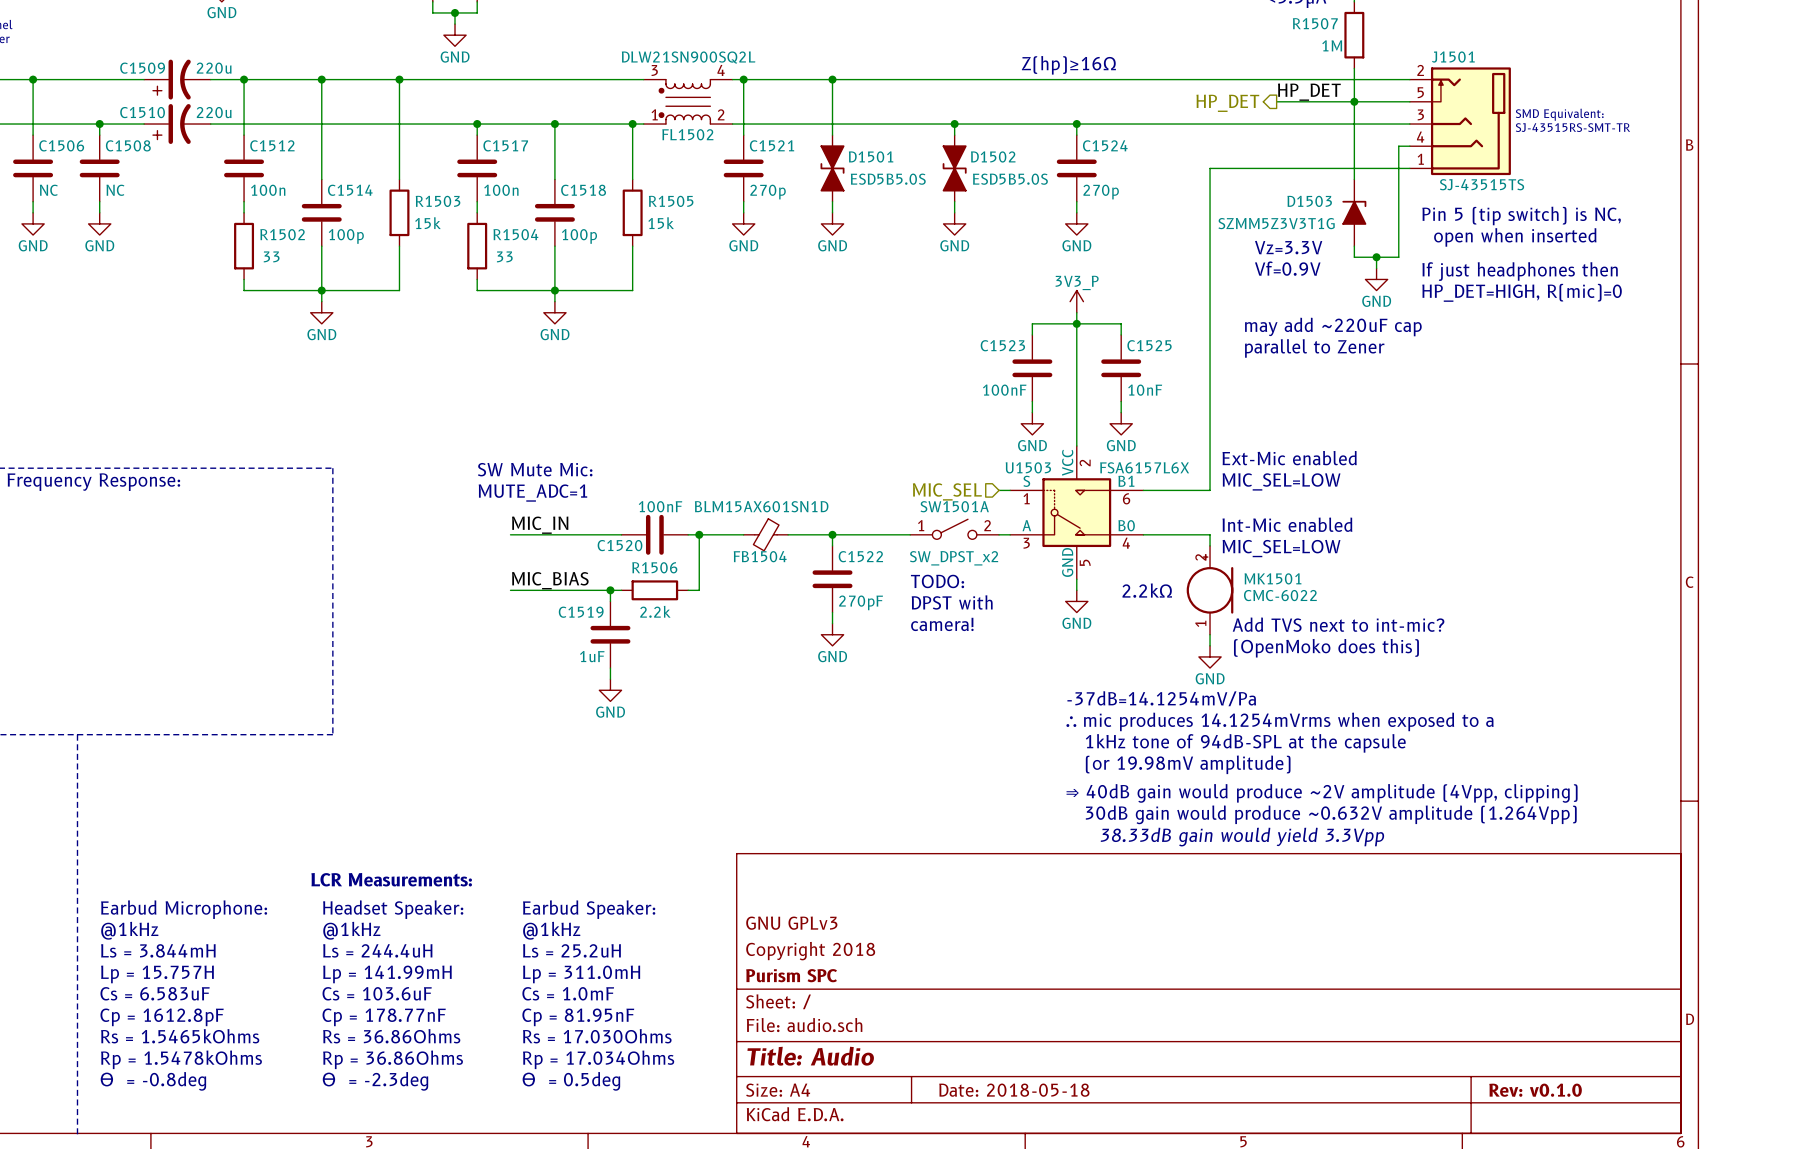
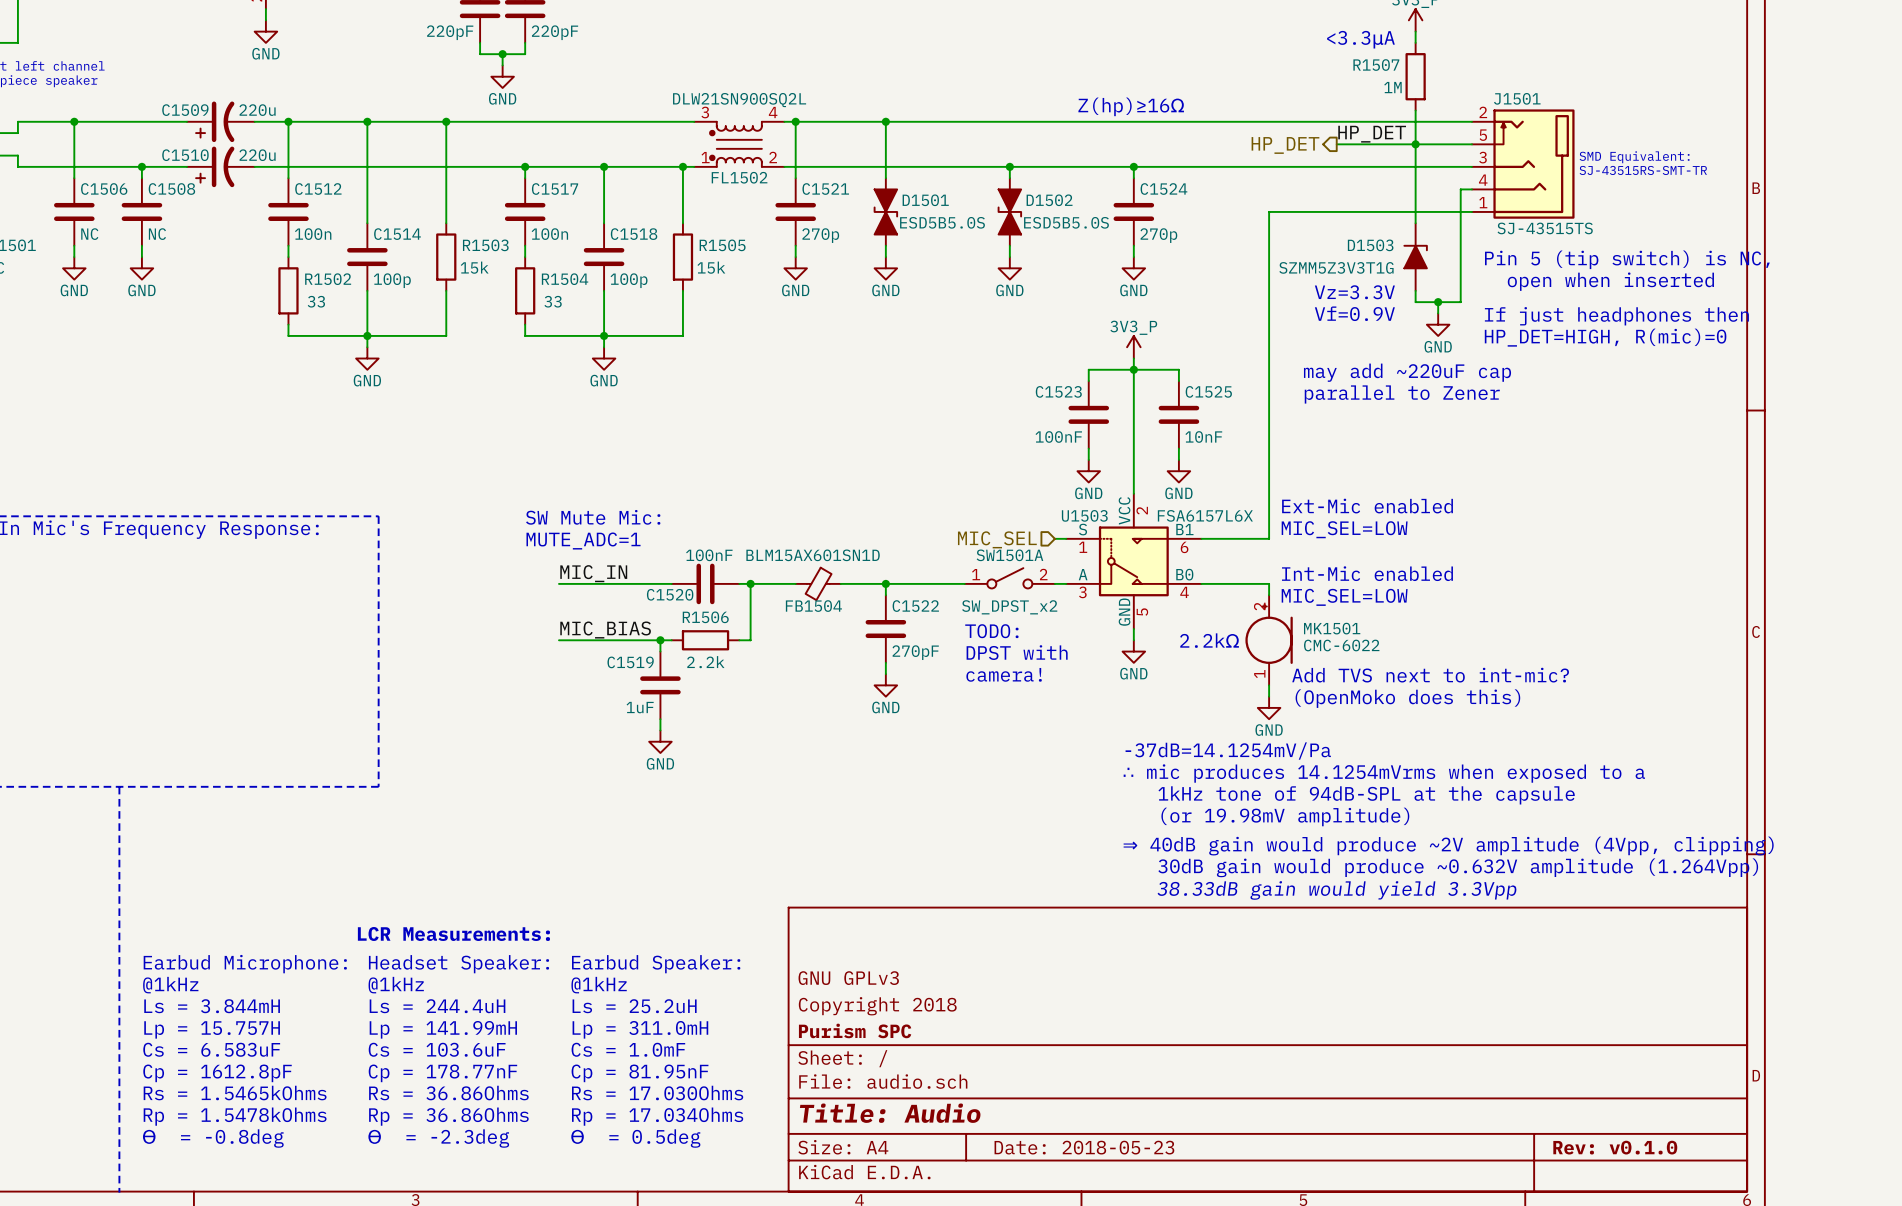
title block: Date: 2018-05-18 (1014, 1090) -> Date: 2018-05-23 (1084, 1147)

